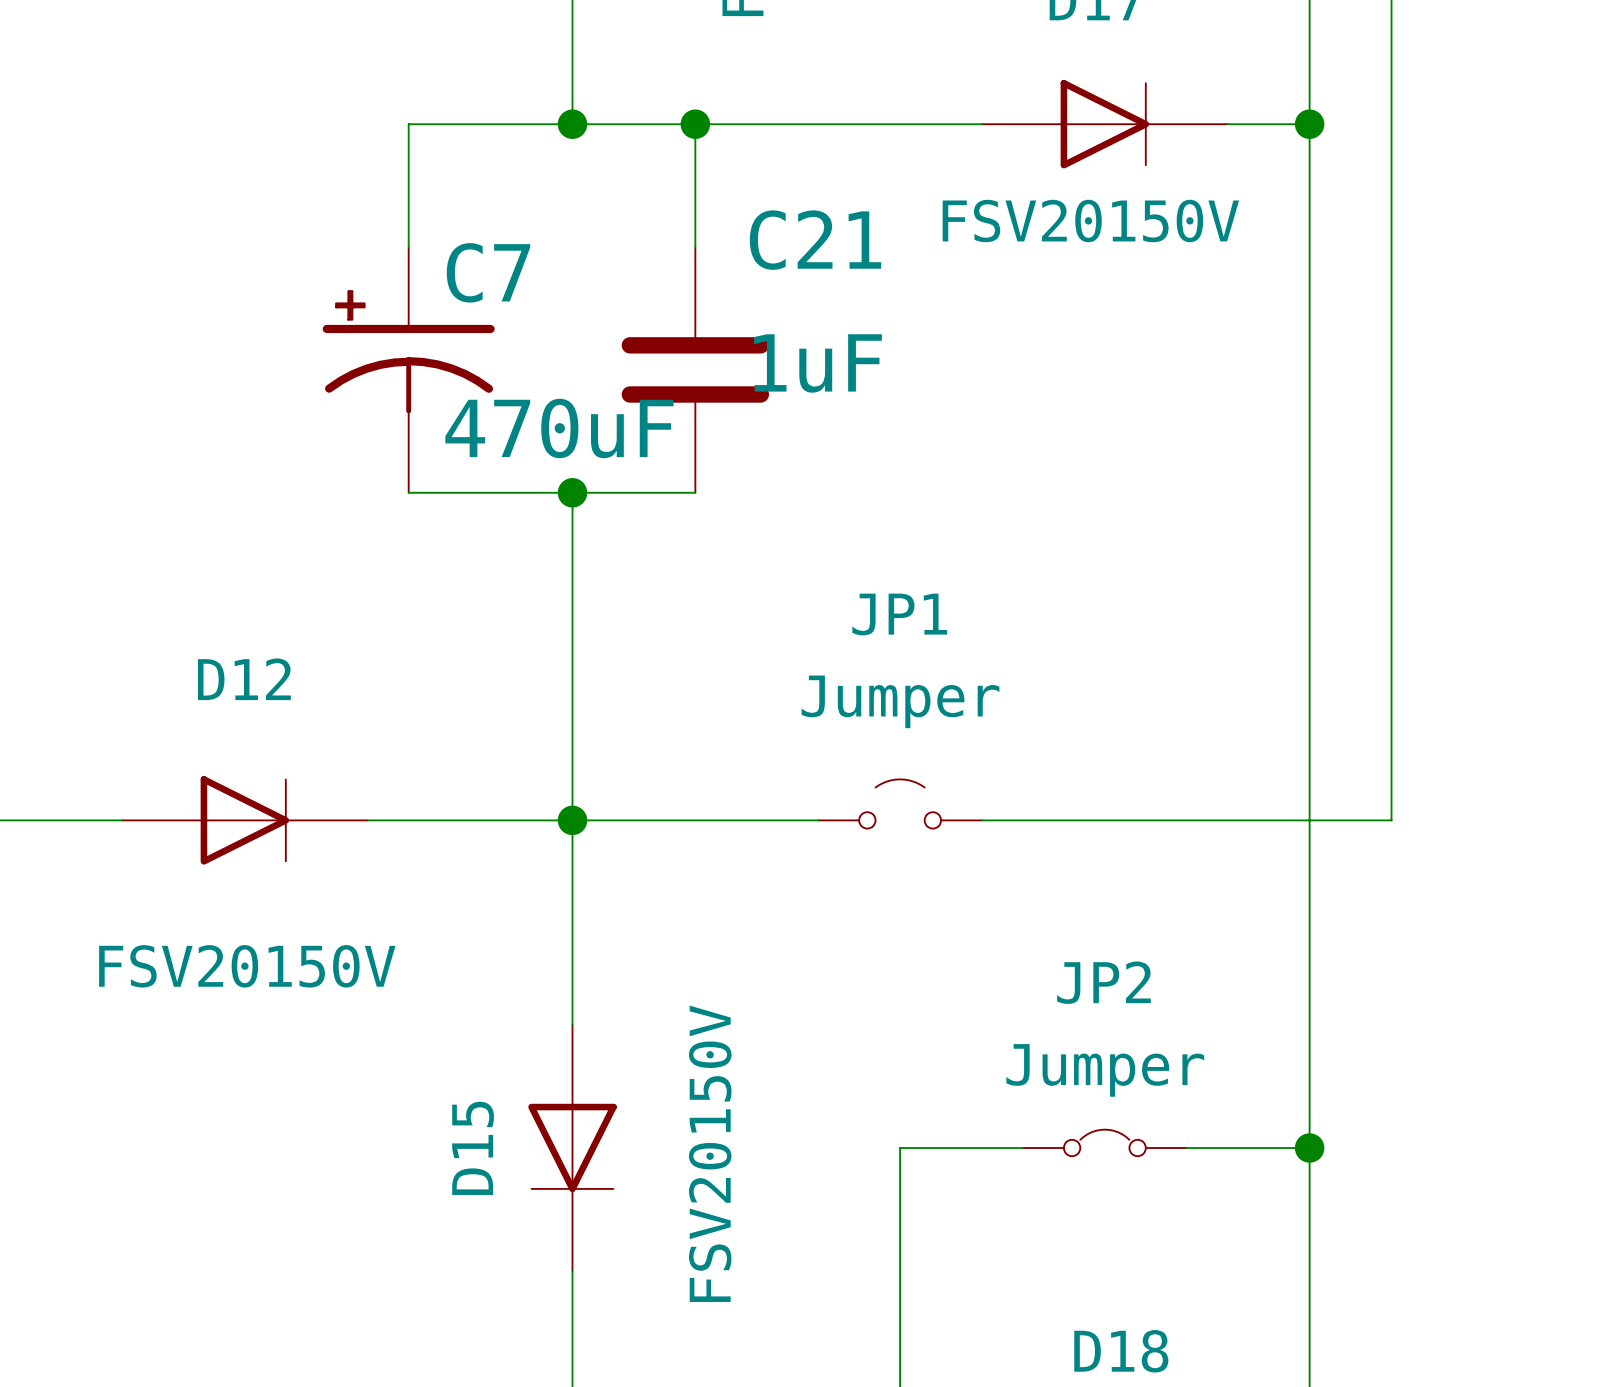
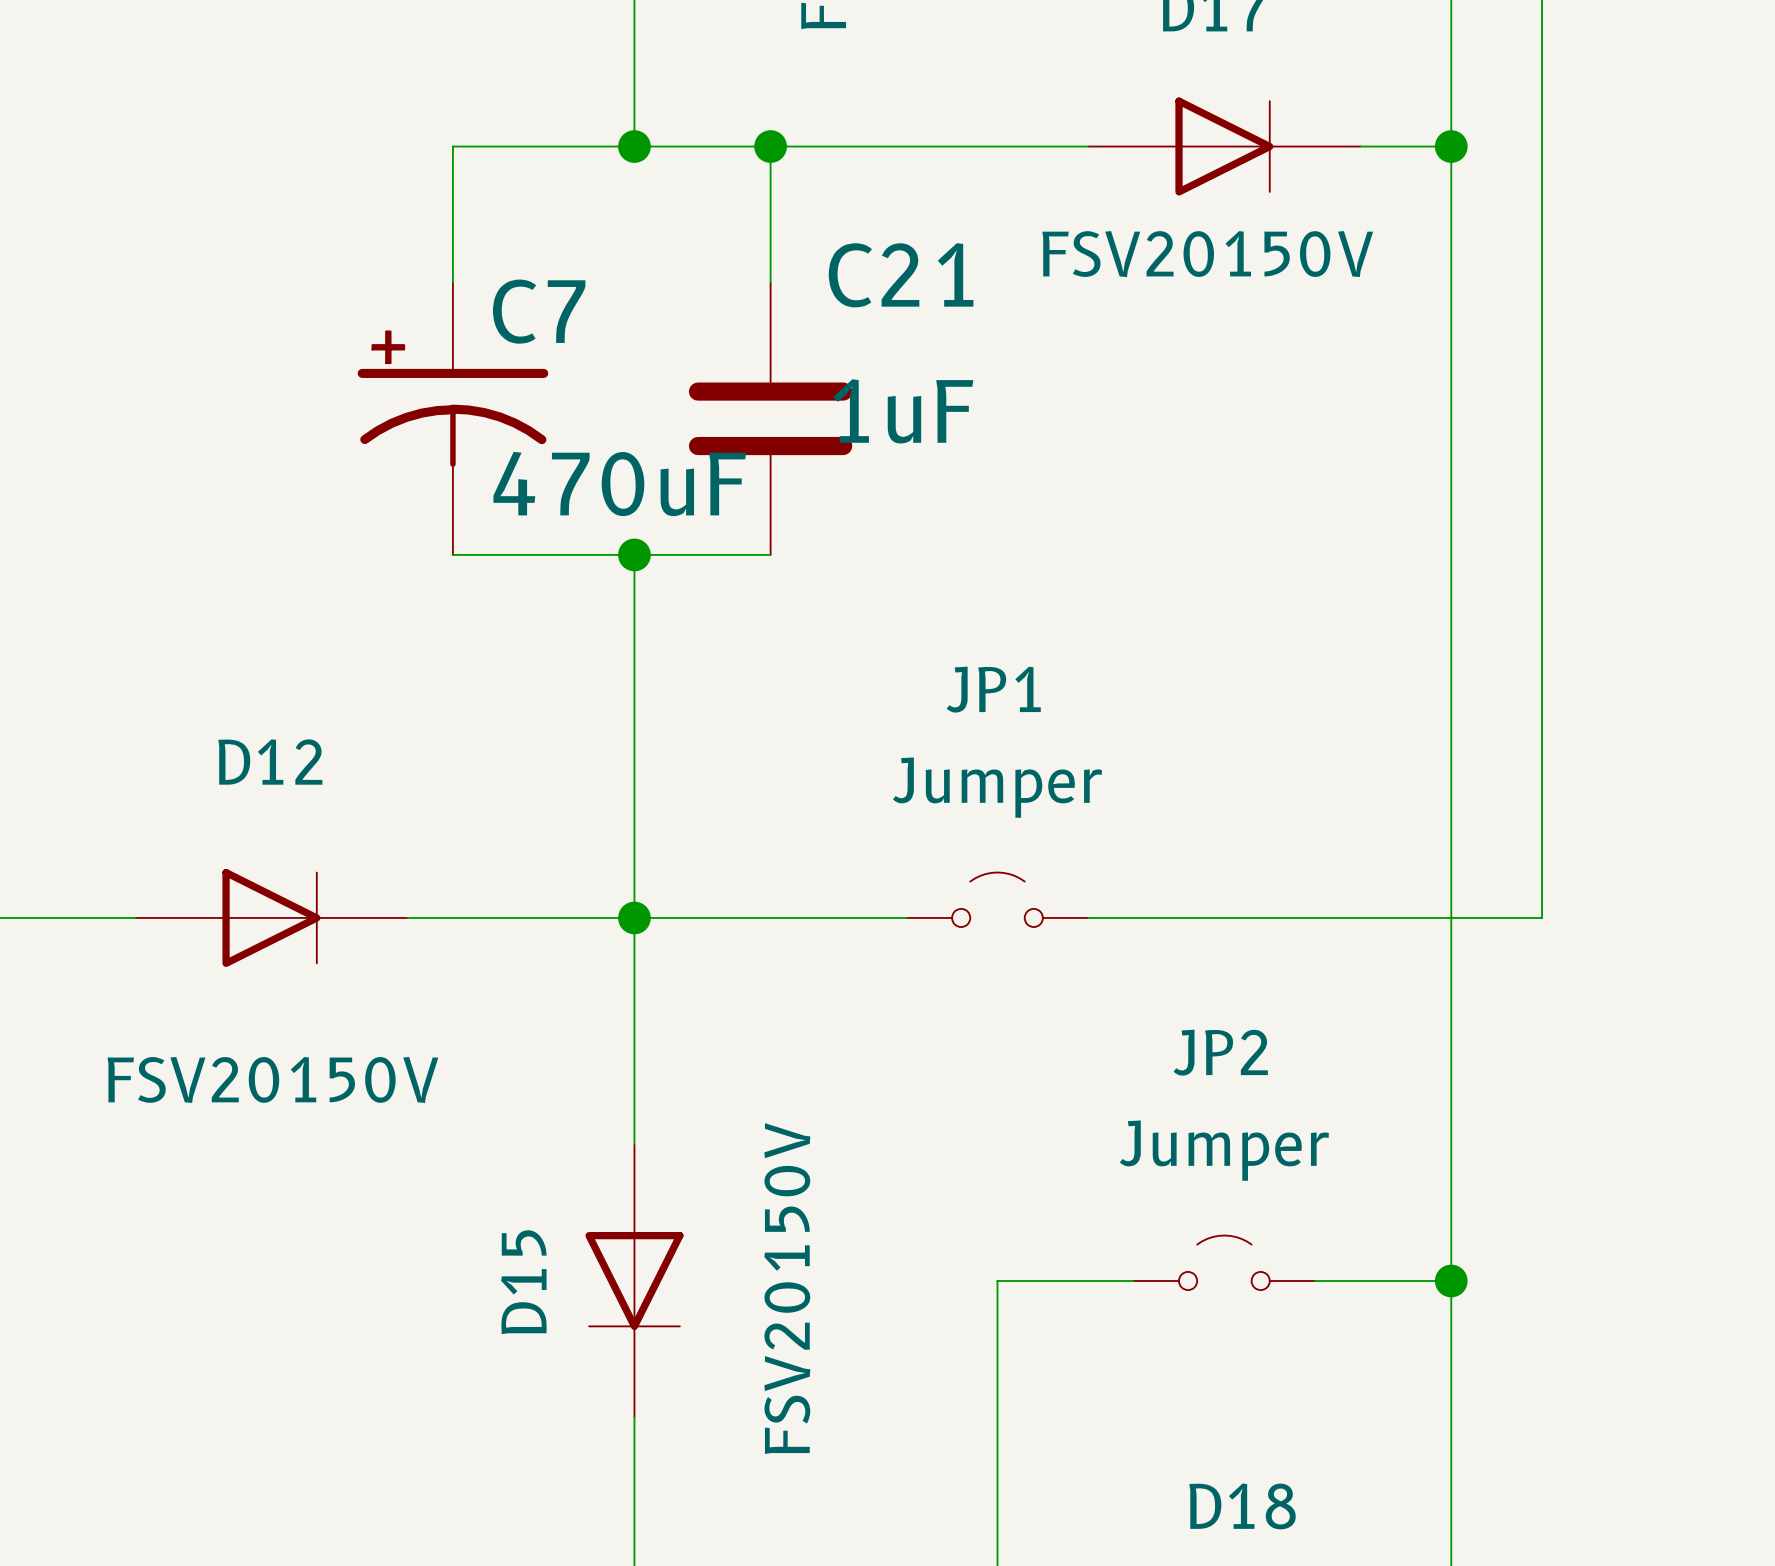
JP2 name position: JP2 (1103, 982) -> JP2 (1220, 1052)
JP2 value position: Jumper (1105, 1070) -> Jumper (1224, 1150)
JP2 symbol: [1022, 1129, 1187, 1157] -> [1133, 1235, 1316, 1291]

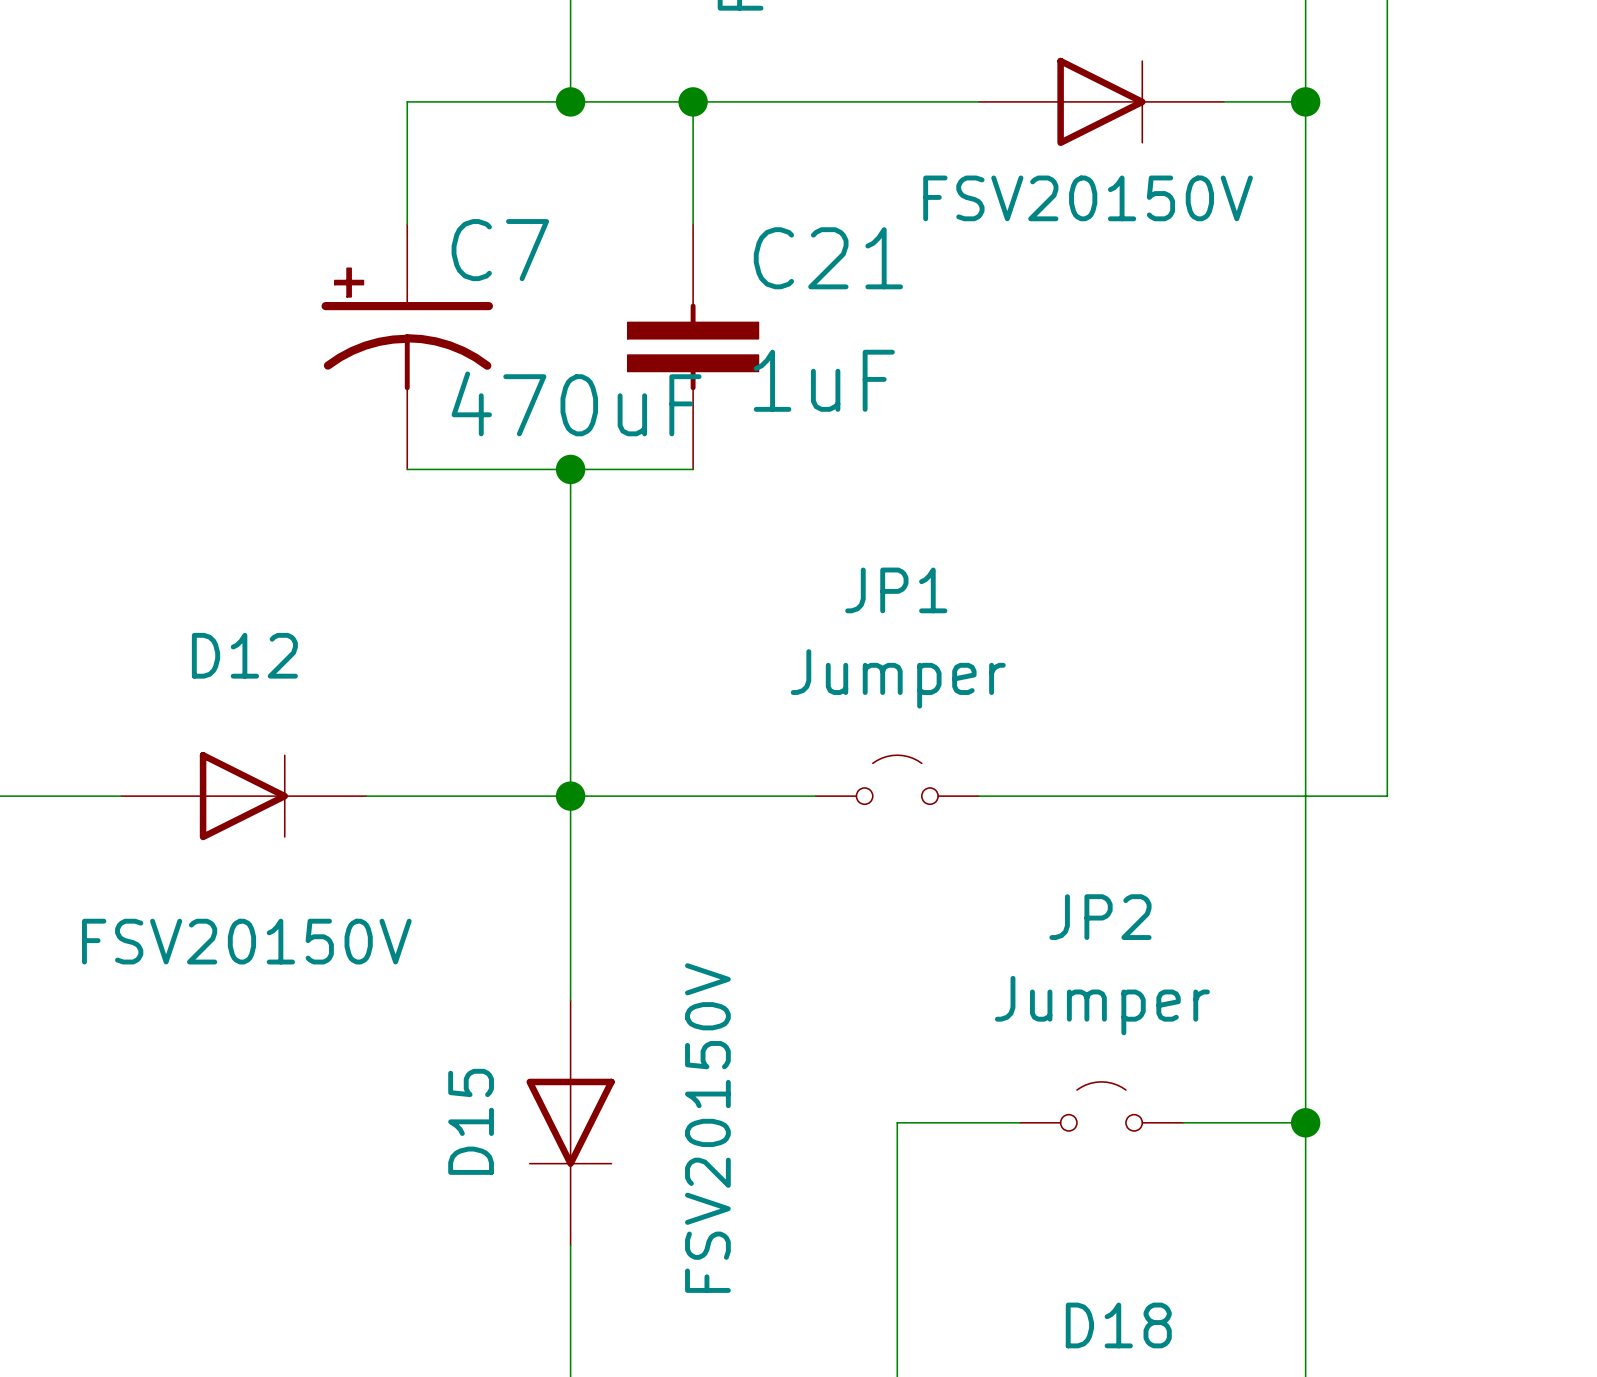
C21 name position: C21 (901, 275) -> C21 (828, 258)
C21 symbol: [688, 282, 853, 555] -> [627, 224, 759, 470]
C21 value position: 1uF (903, 411) -> 1uF (824, 380)

